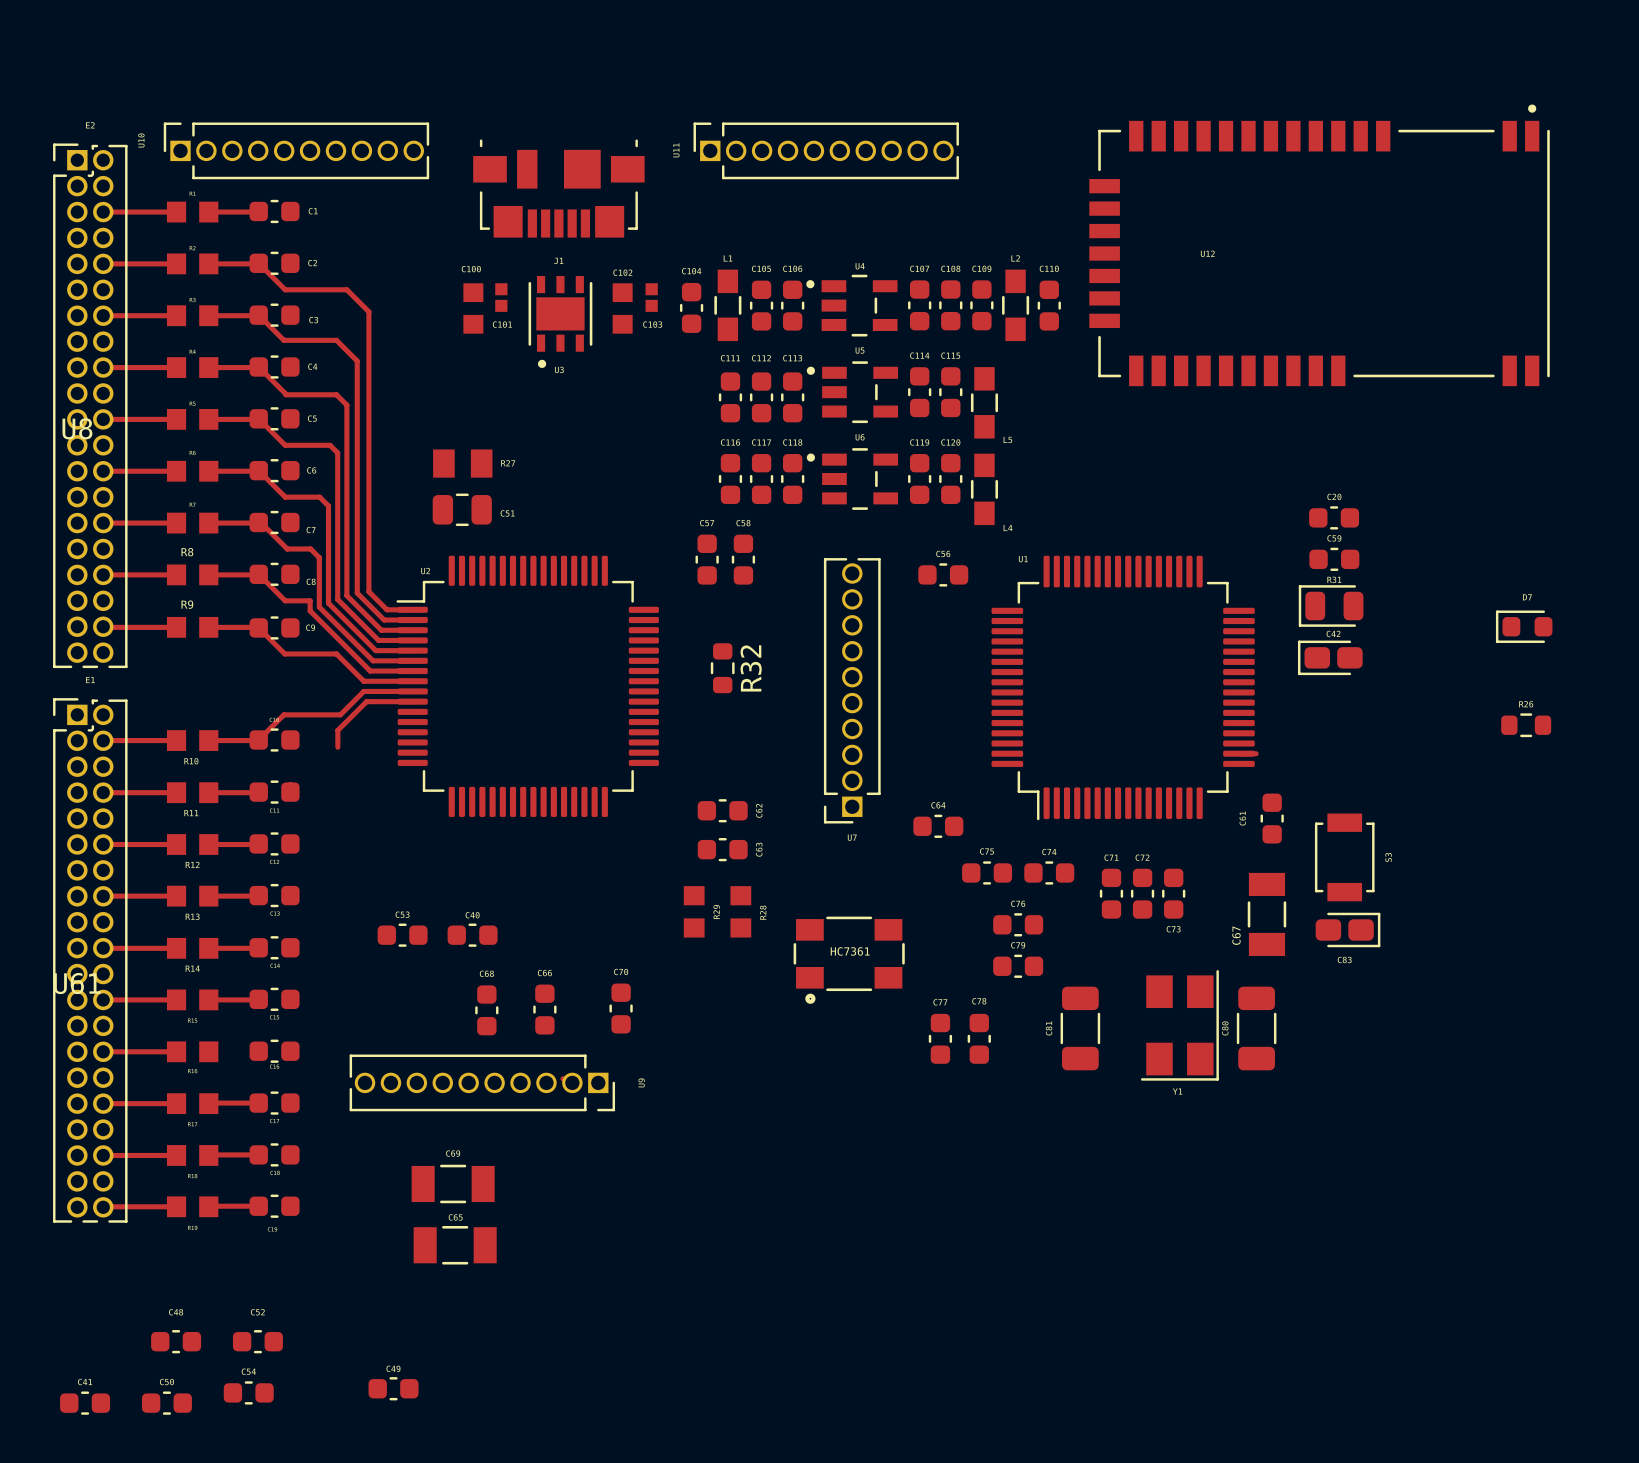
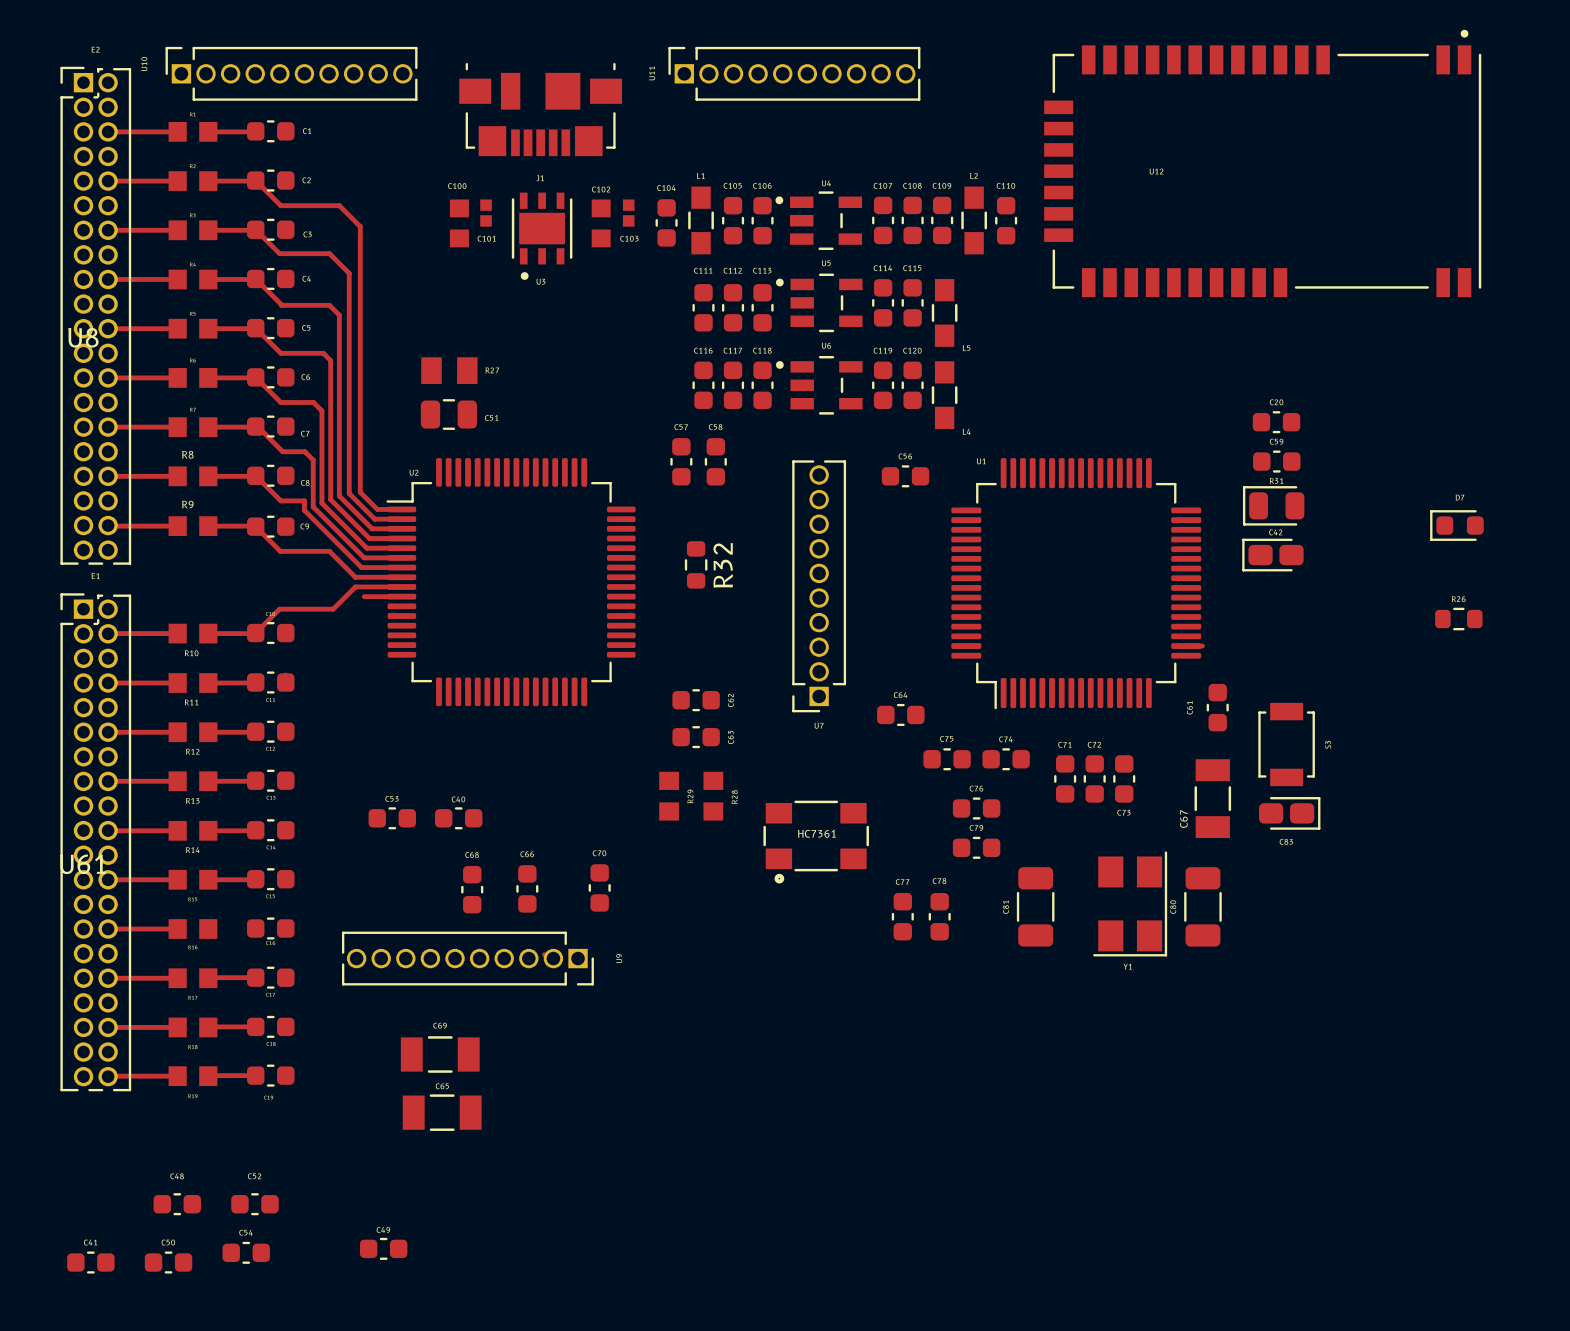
track: (373, 701) (366, 701) (337, 730) (337, 747) -> none

